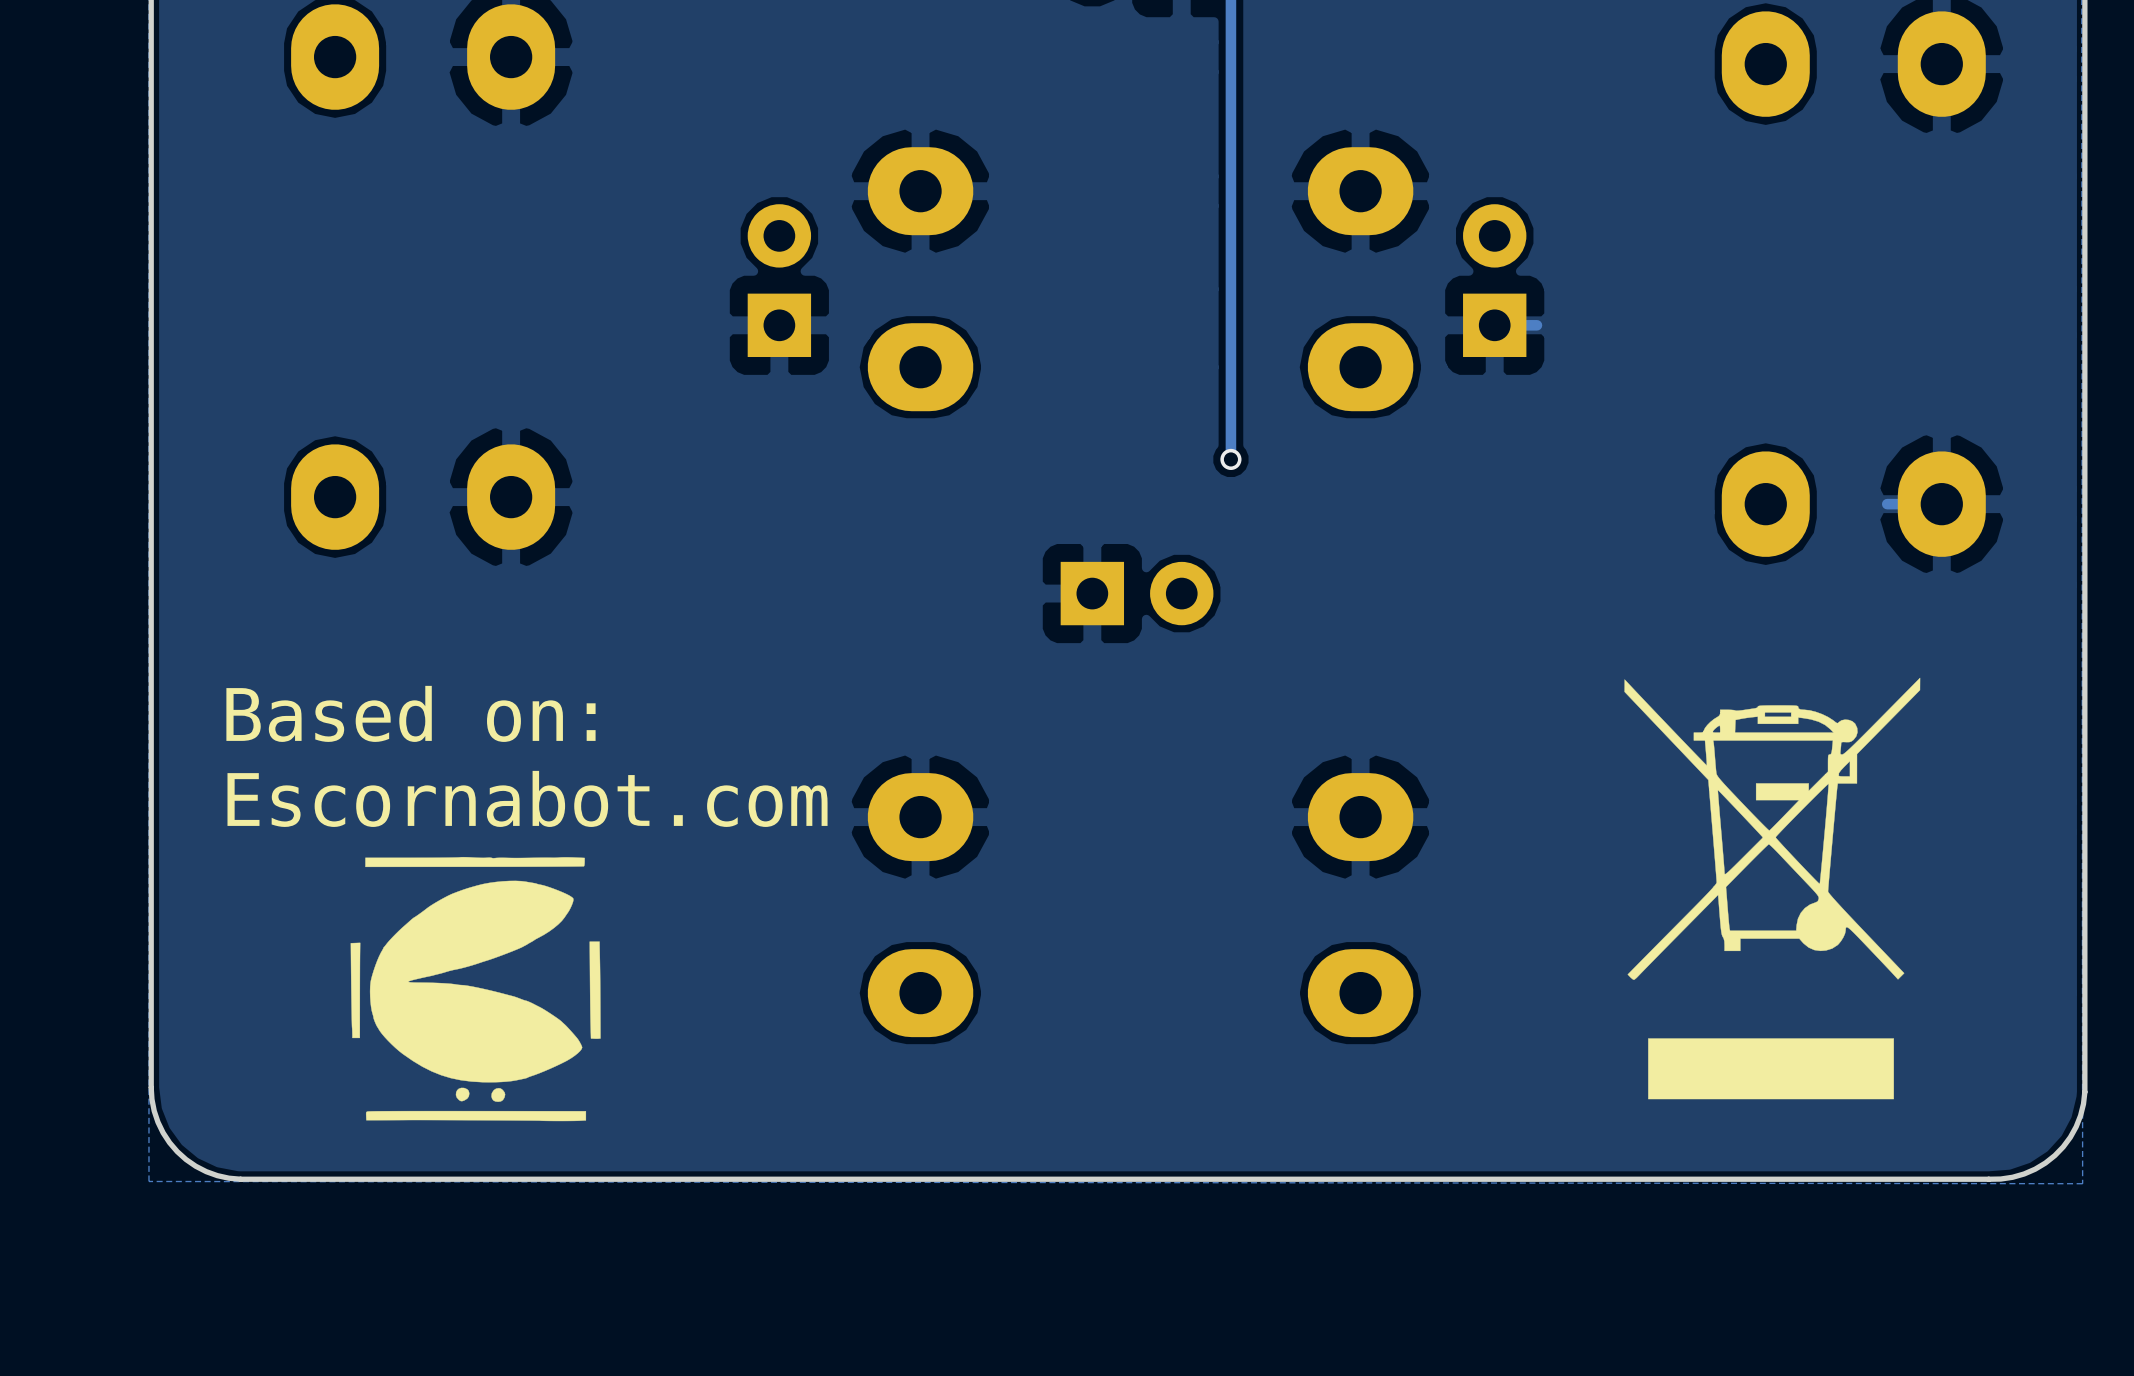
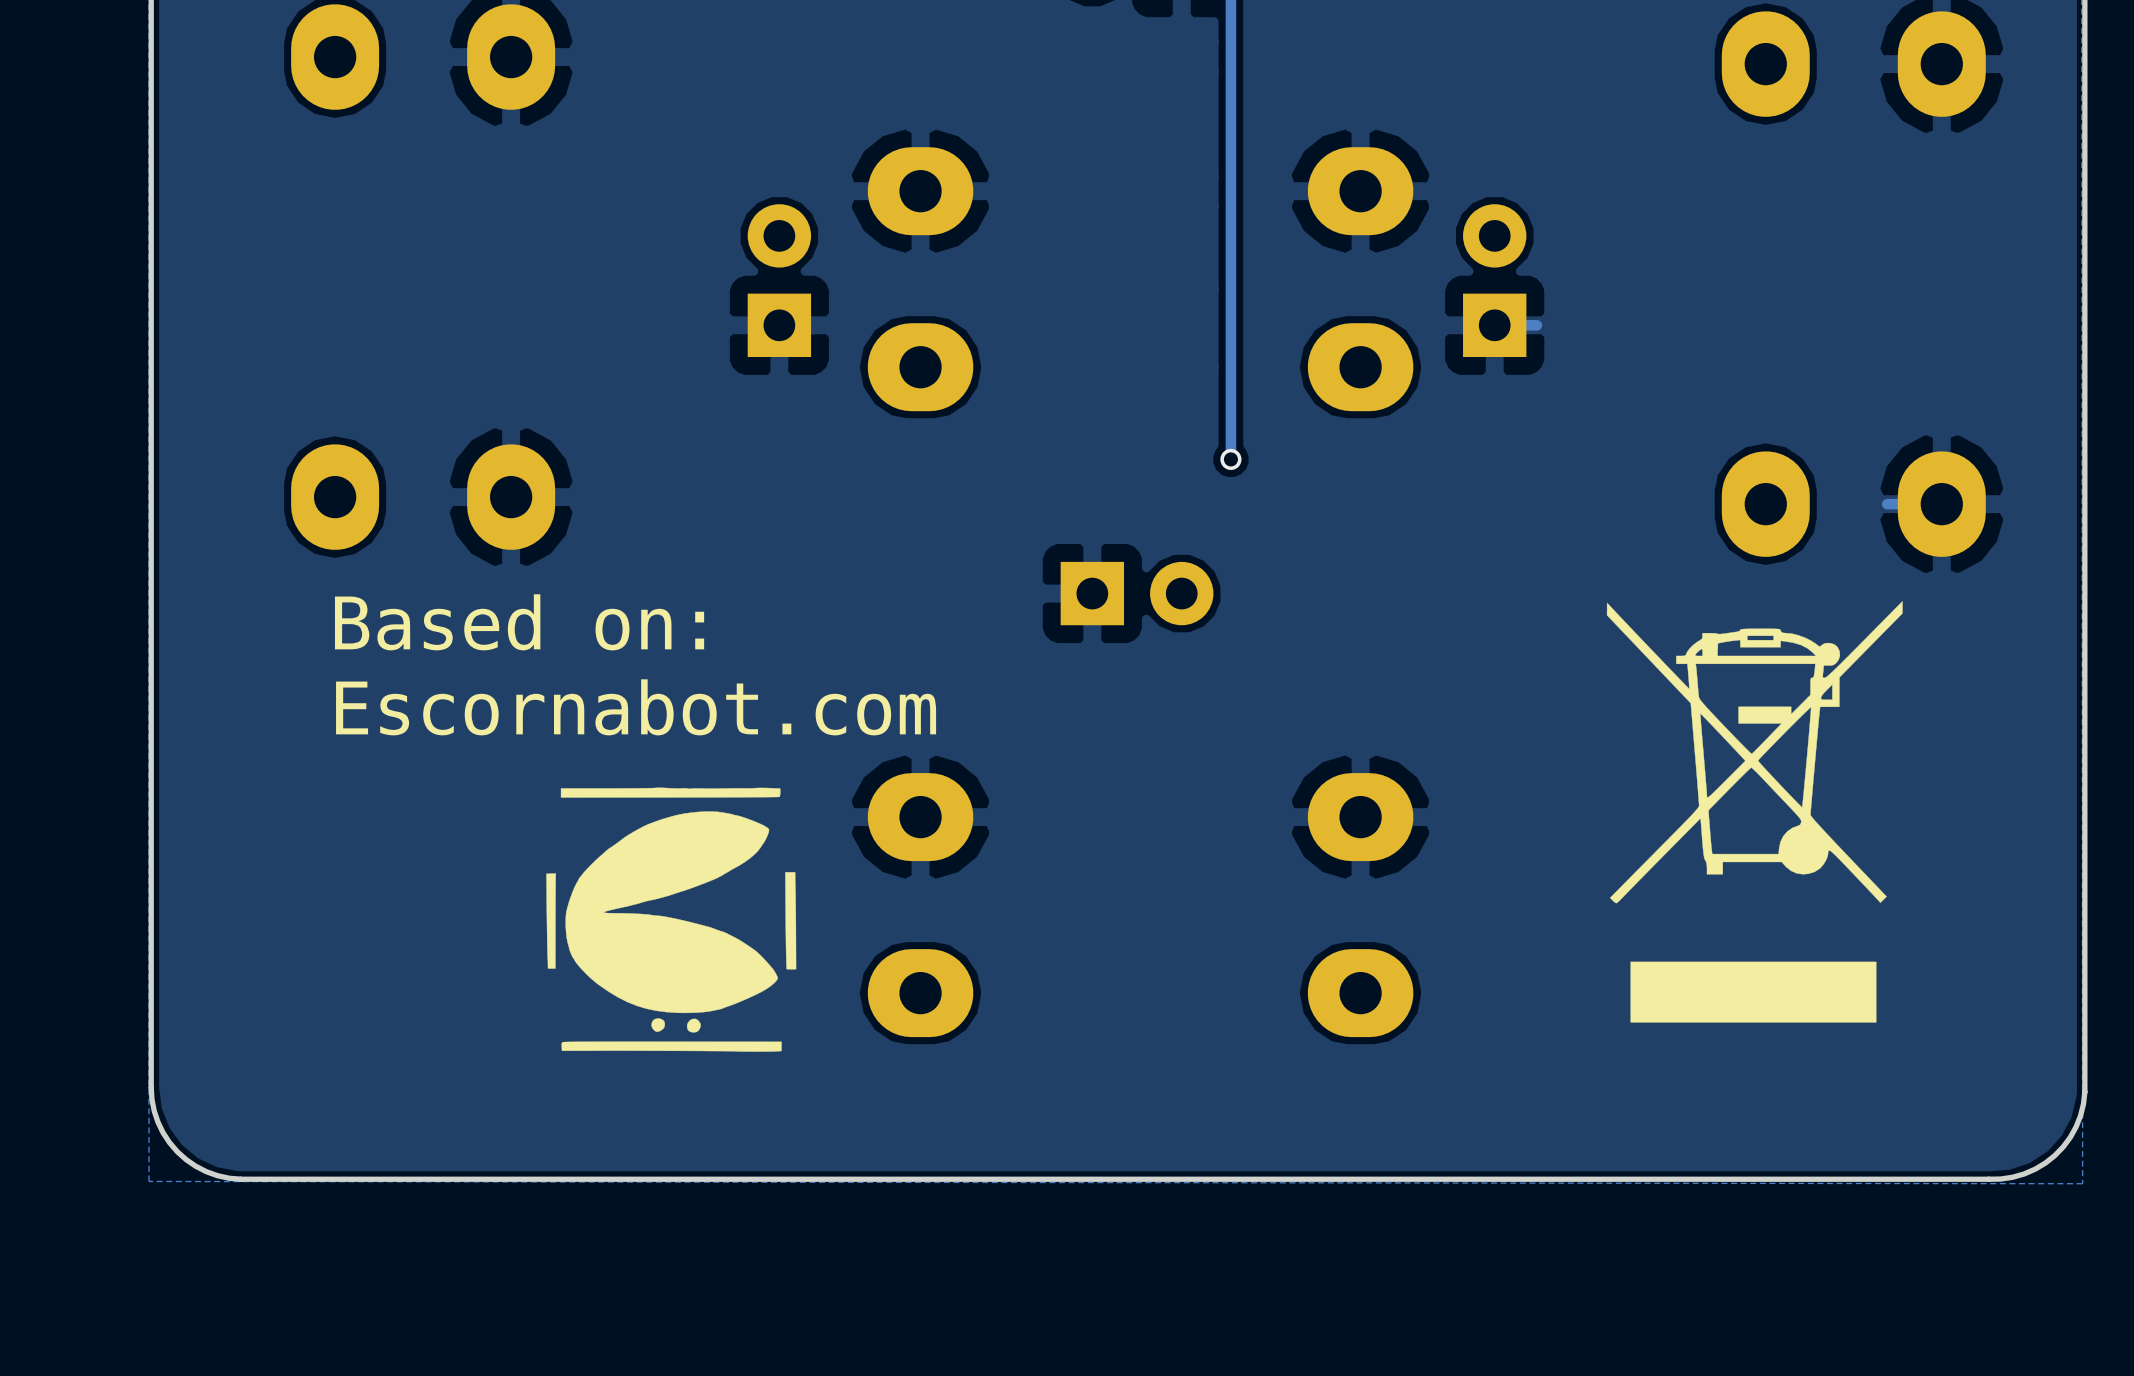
text position: Based on: (410, 713) -> Based on: (519, 622)
text position: Escornabot.com (527, 798) -> Escornabot.com (636, 707)
drawing position: (1772, 888) -> (1754, 811)
drawing position: (475, 989) -> (671, 919)

